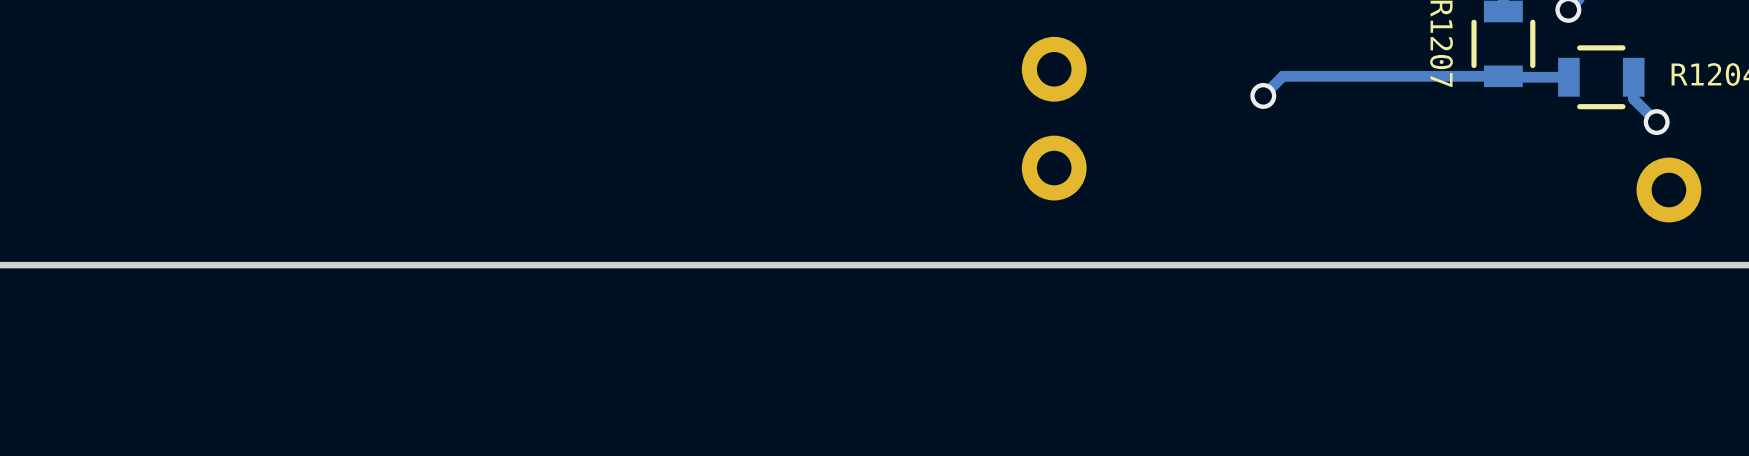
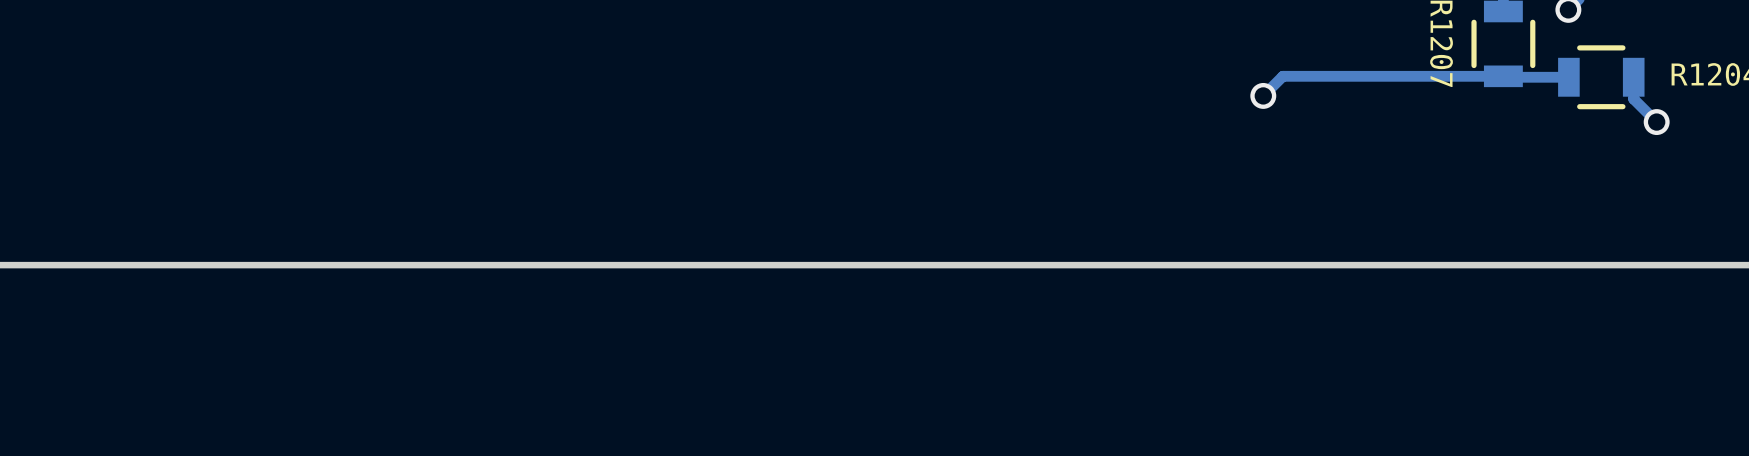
part: (1054, 69) -> none
part: (1054, 168) -> none
part: (1668, 190) -> none

